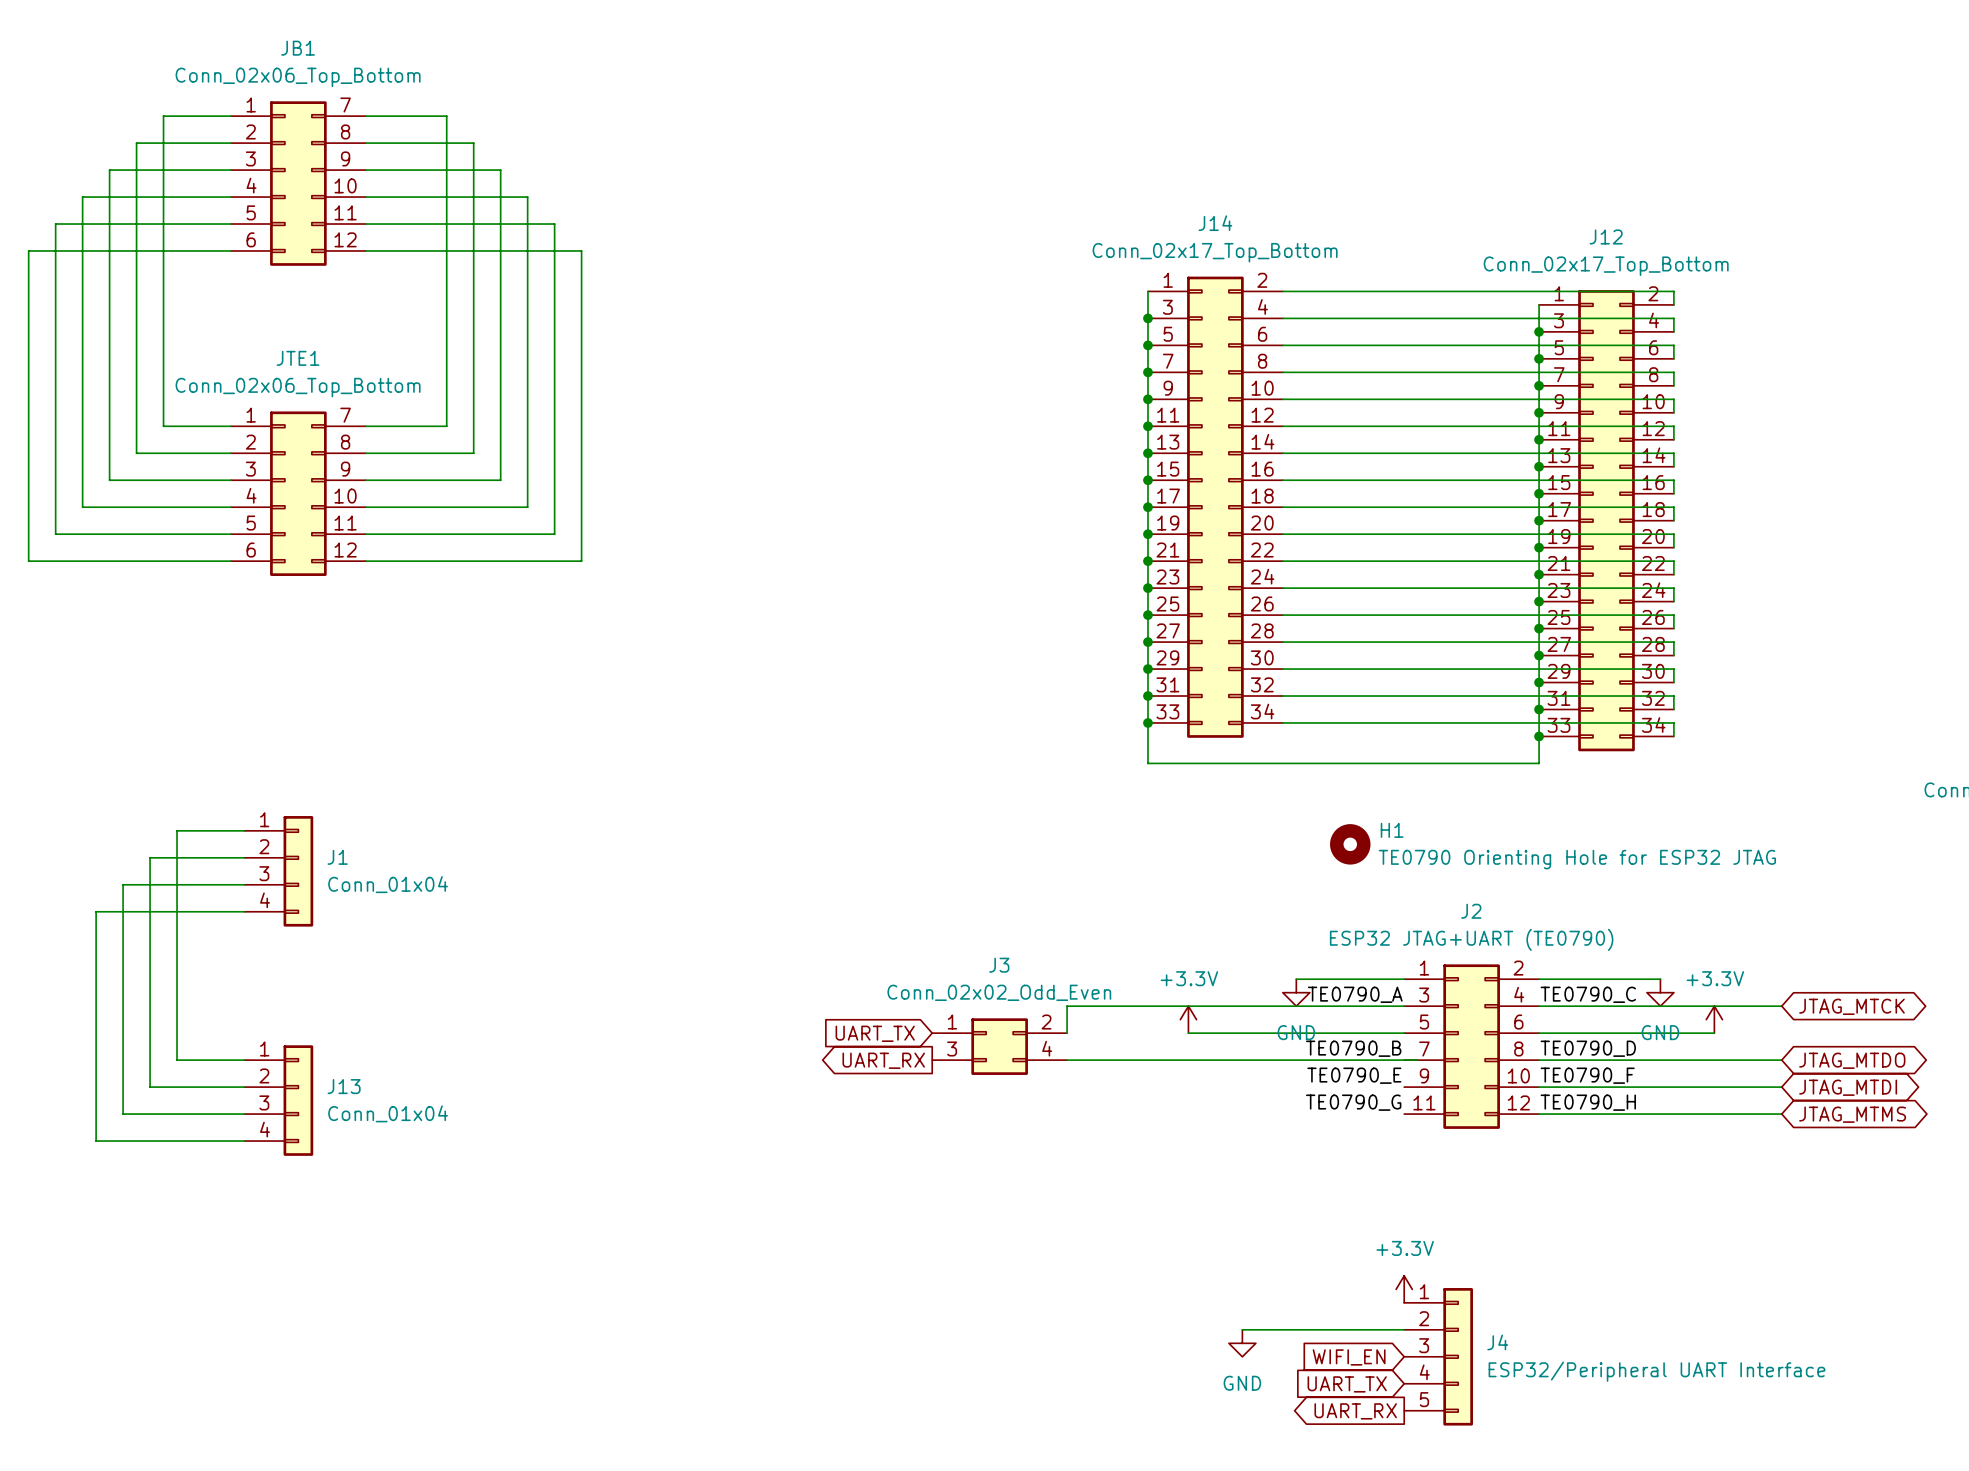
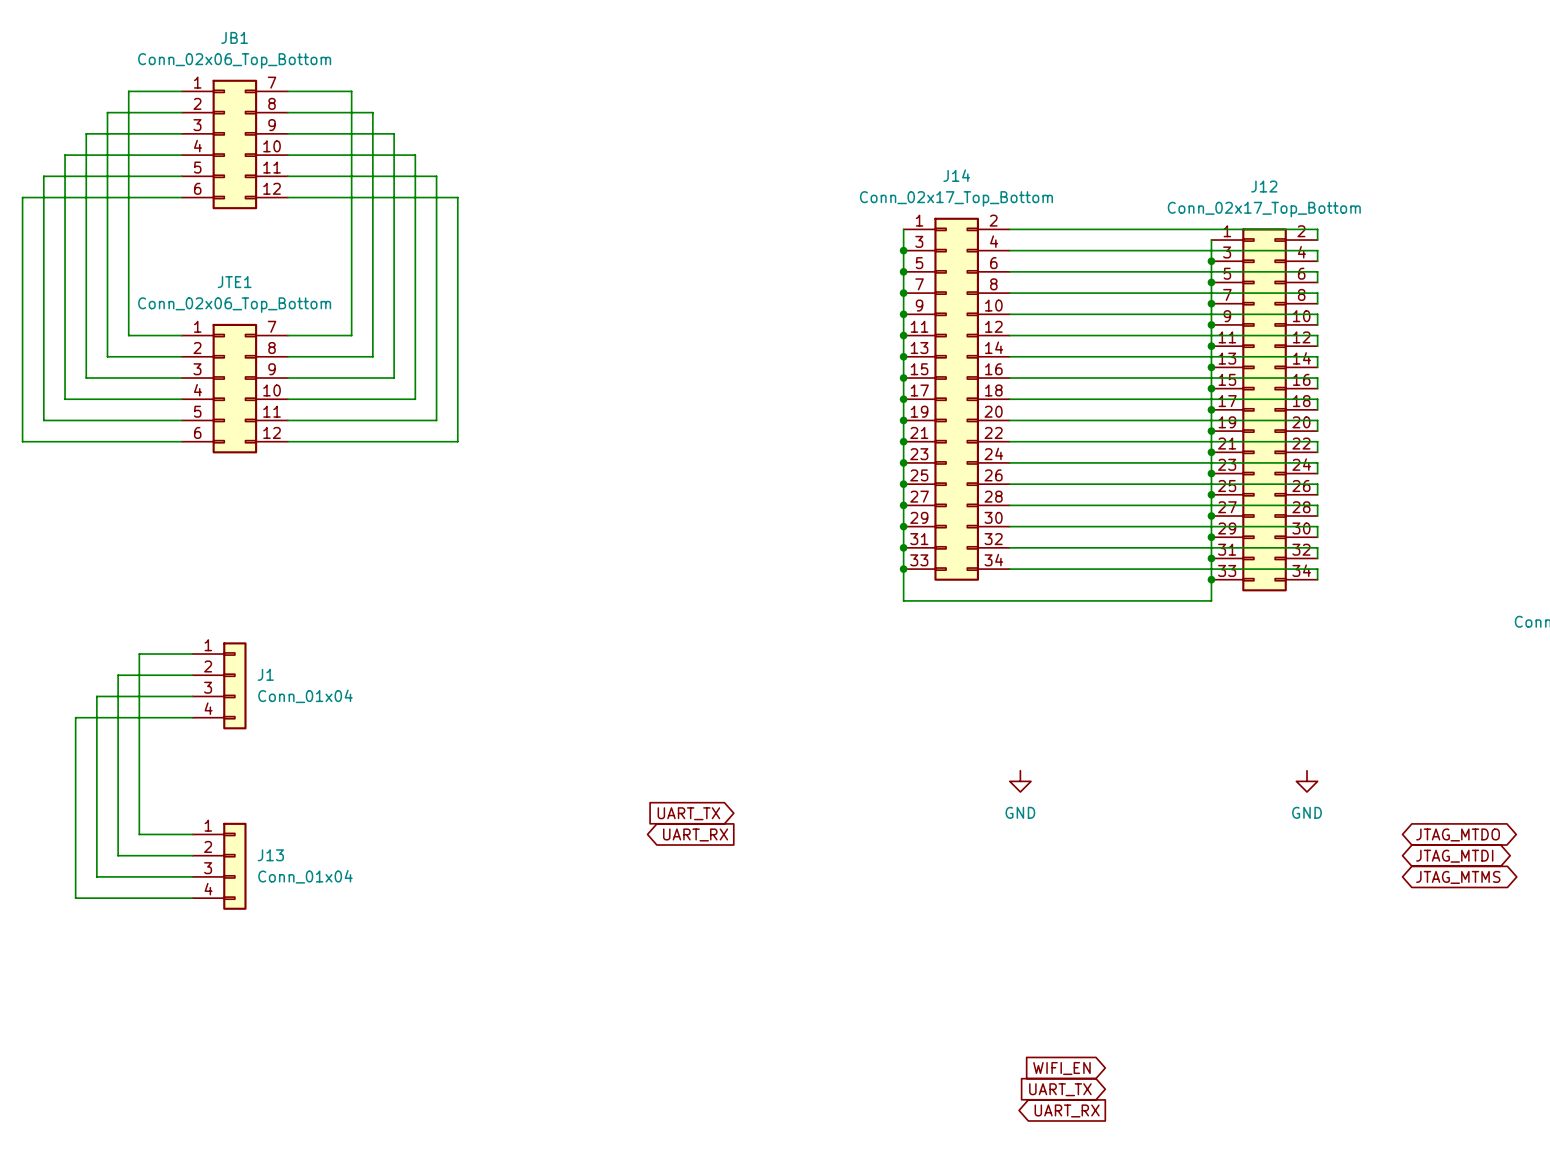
H1: TE0790 Orienting Hole for ESP32 JTAG (1350, 844) -> none
wire: (1296, 979) (1404, 979) -> none
wire: (1539, 979) (1660, 979) -> none
label: TE0790_A (1355, 994) -> none
label: TE0790_C (1588, 994) -> none
wire: (1404, 1006) (1067, 1006) (1067, 1033) -> none
wire: (1539, 1006) (1781, 1006) -> none
global label: JTAG_MTCK (1851, 1006) -> none
power symbol: +3.3V (1188, 1019) -> none
power symbol: +3.3V (1714, 1019) -> none
wire: (1188, 1033) (1404, 1033) -> none
wire: (1539, 1033) (1714, 1033) -> none
J3: Conn_02x02_Odd_Even (999, 1046) -> none
J2: ESP32 JTAG+UART (TE0790) (1471, 1046) -> none
label: TE0790_B (1353, 1048) -> none
label: TE0790_D (1588, 1048) -> none
wire: (1067, 1060) (1417, 1060) -> none
wire: (1539, 1060) (1781, 1060) -> none
label: TE0790_E (1354, 1075) -> none
label: TE0790_F (1587, 1075) -> none
wire: (1539, 1087) (1781, 1087) -> none
label: TE0790_G (1353, 1102) -> none
label: TE0790_H (1588, 1102) -> none
wire: (1539, 1114) (1781, 1114) -> none
power symbol: +3.3V (1404, 1289) -> none
wire: (1242, 1329) (1404, 1329) -> none
power symbol: GND (1242, 1343) -> none
J4: ESP32/Peripheral UART Interface (1438, 1356) -> none

